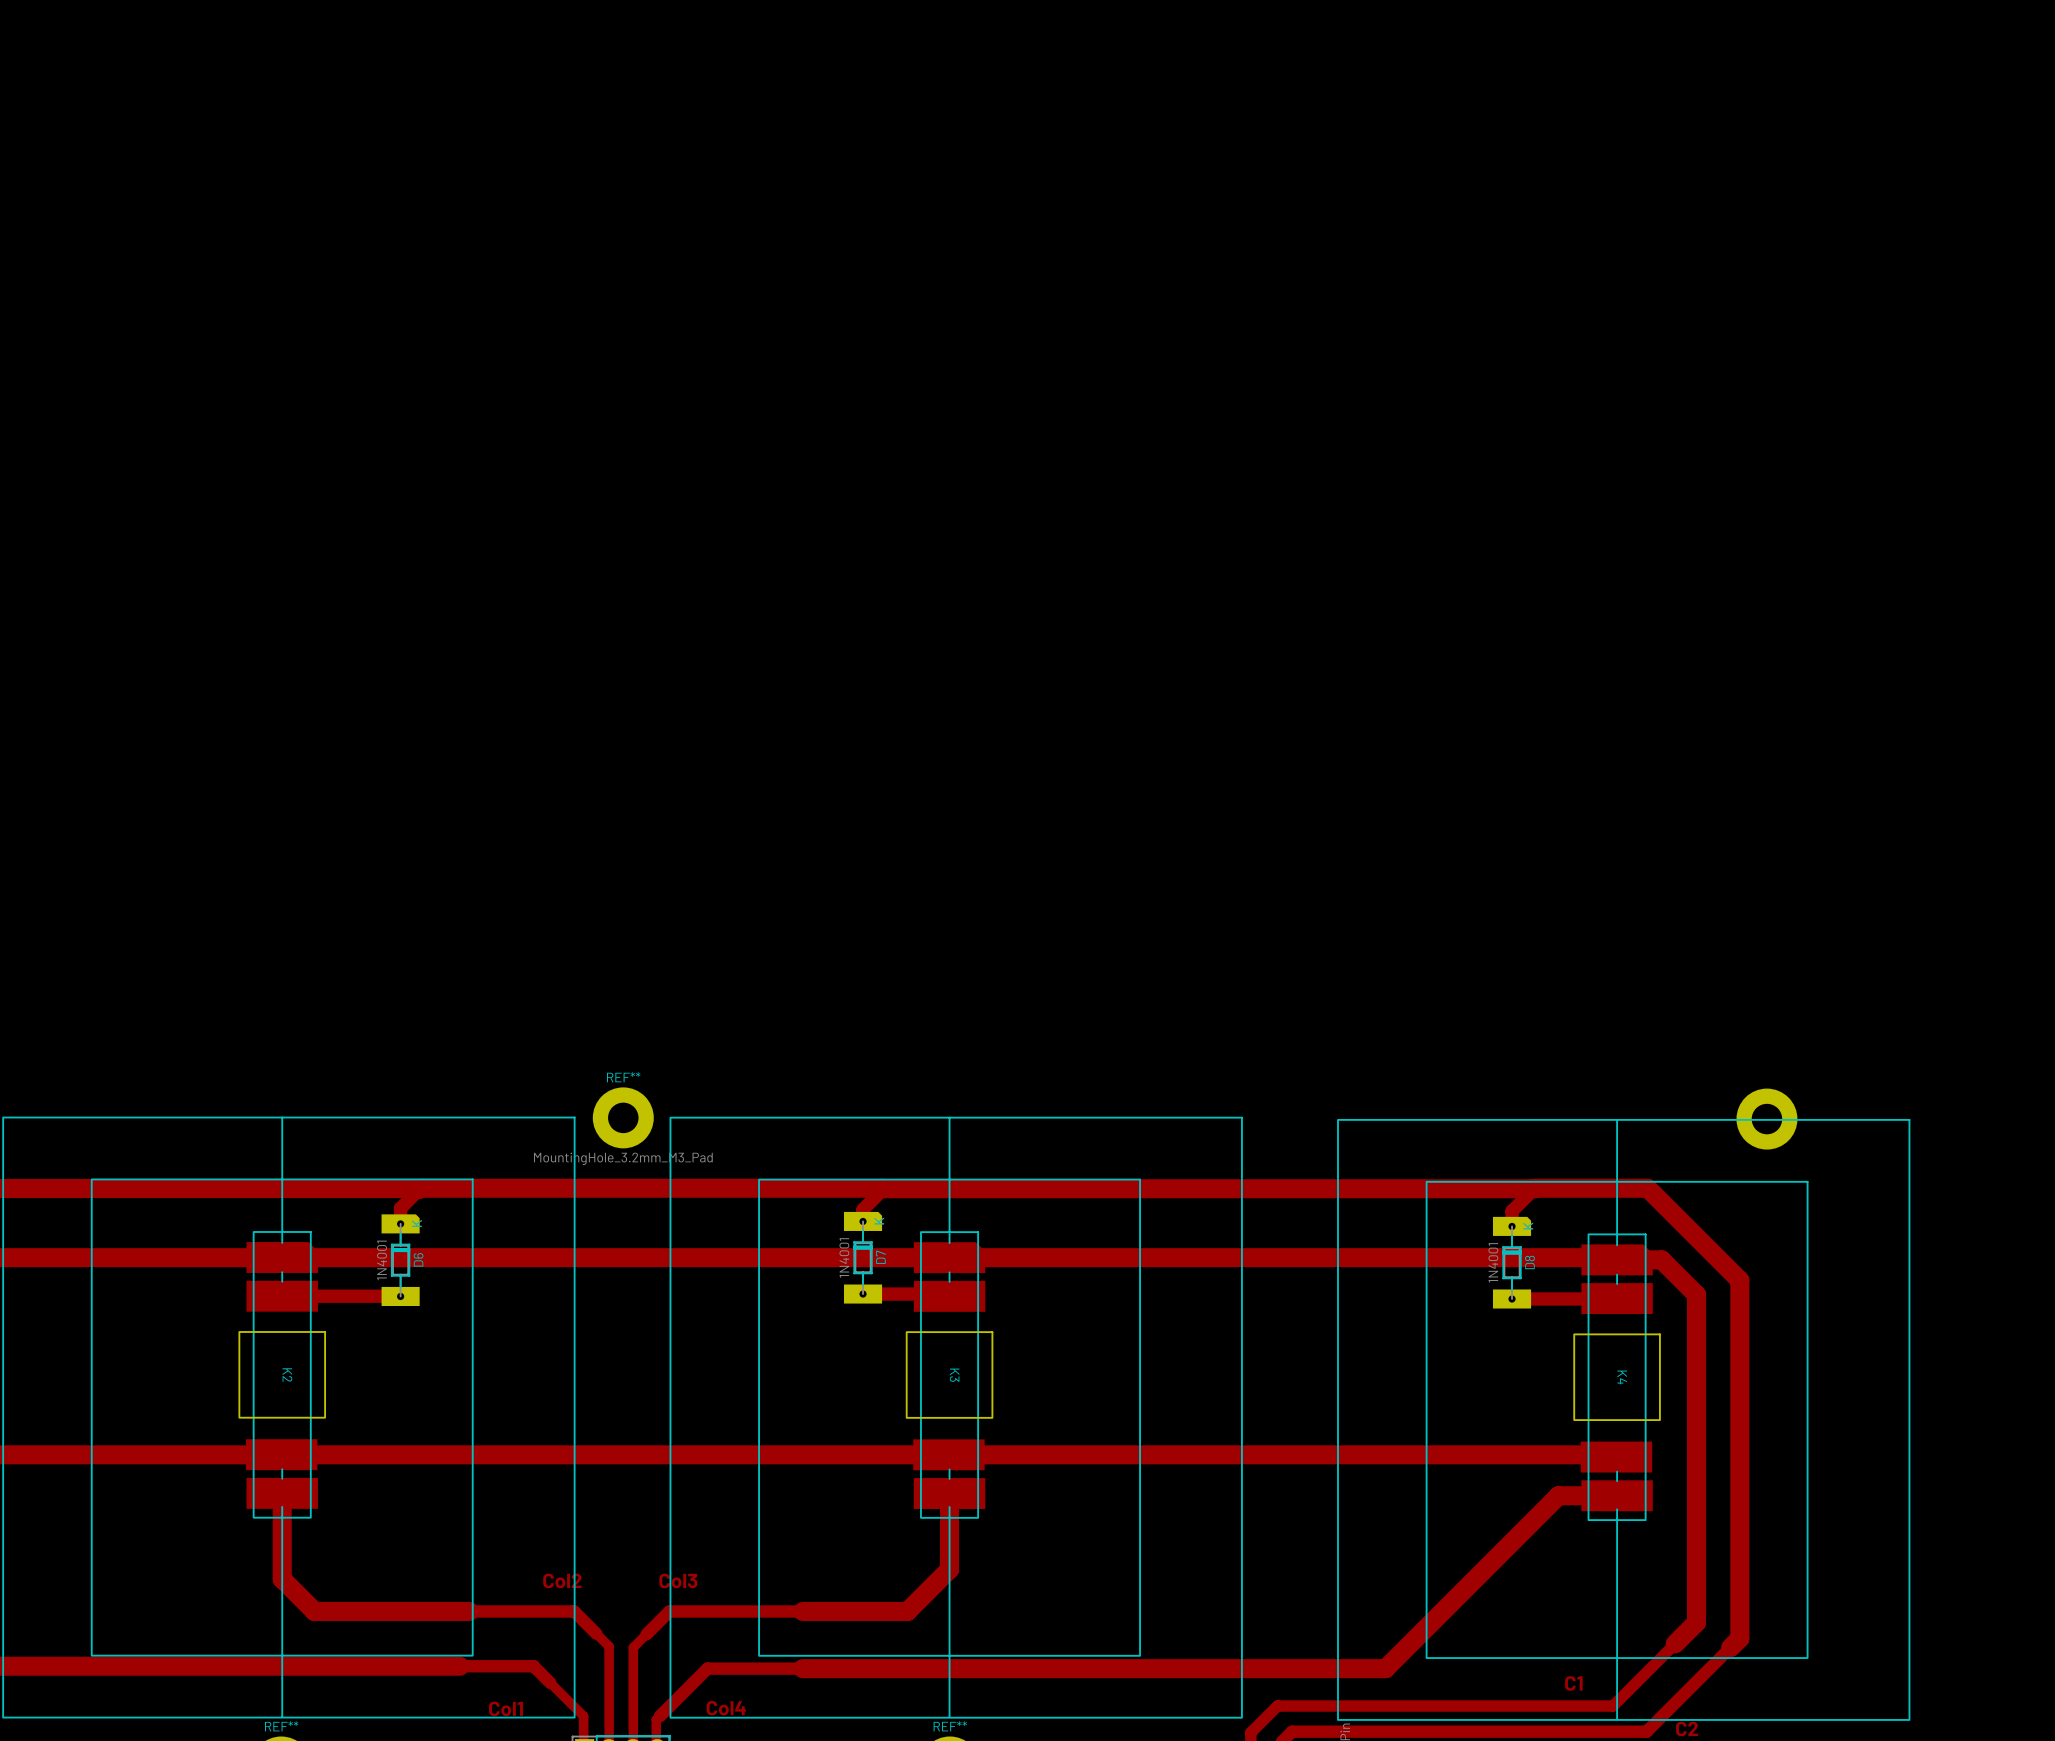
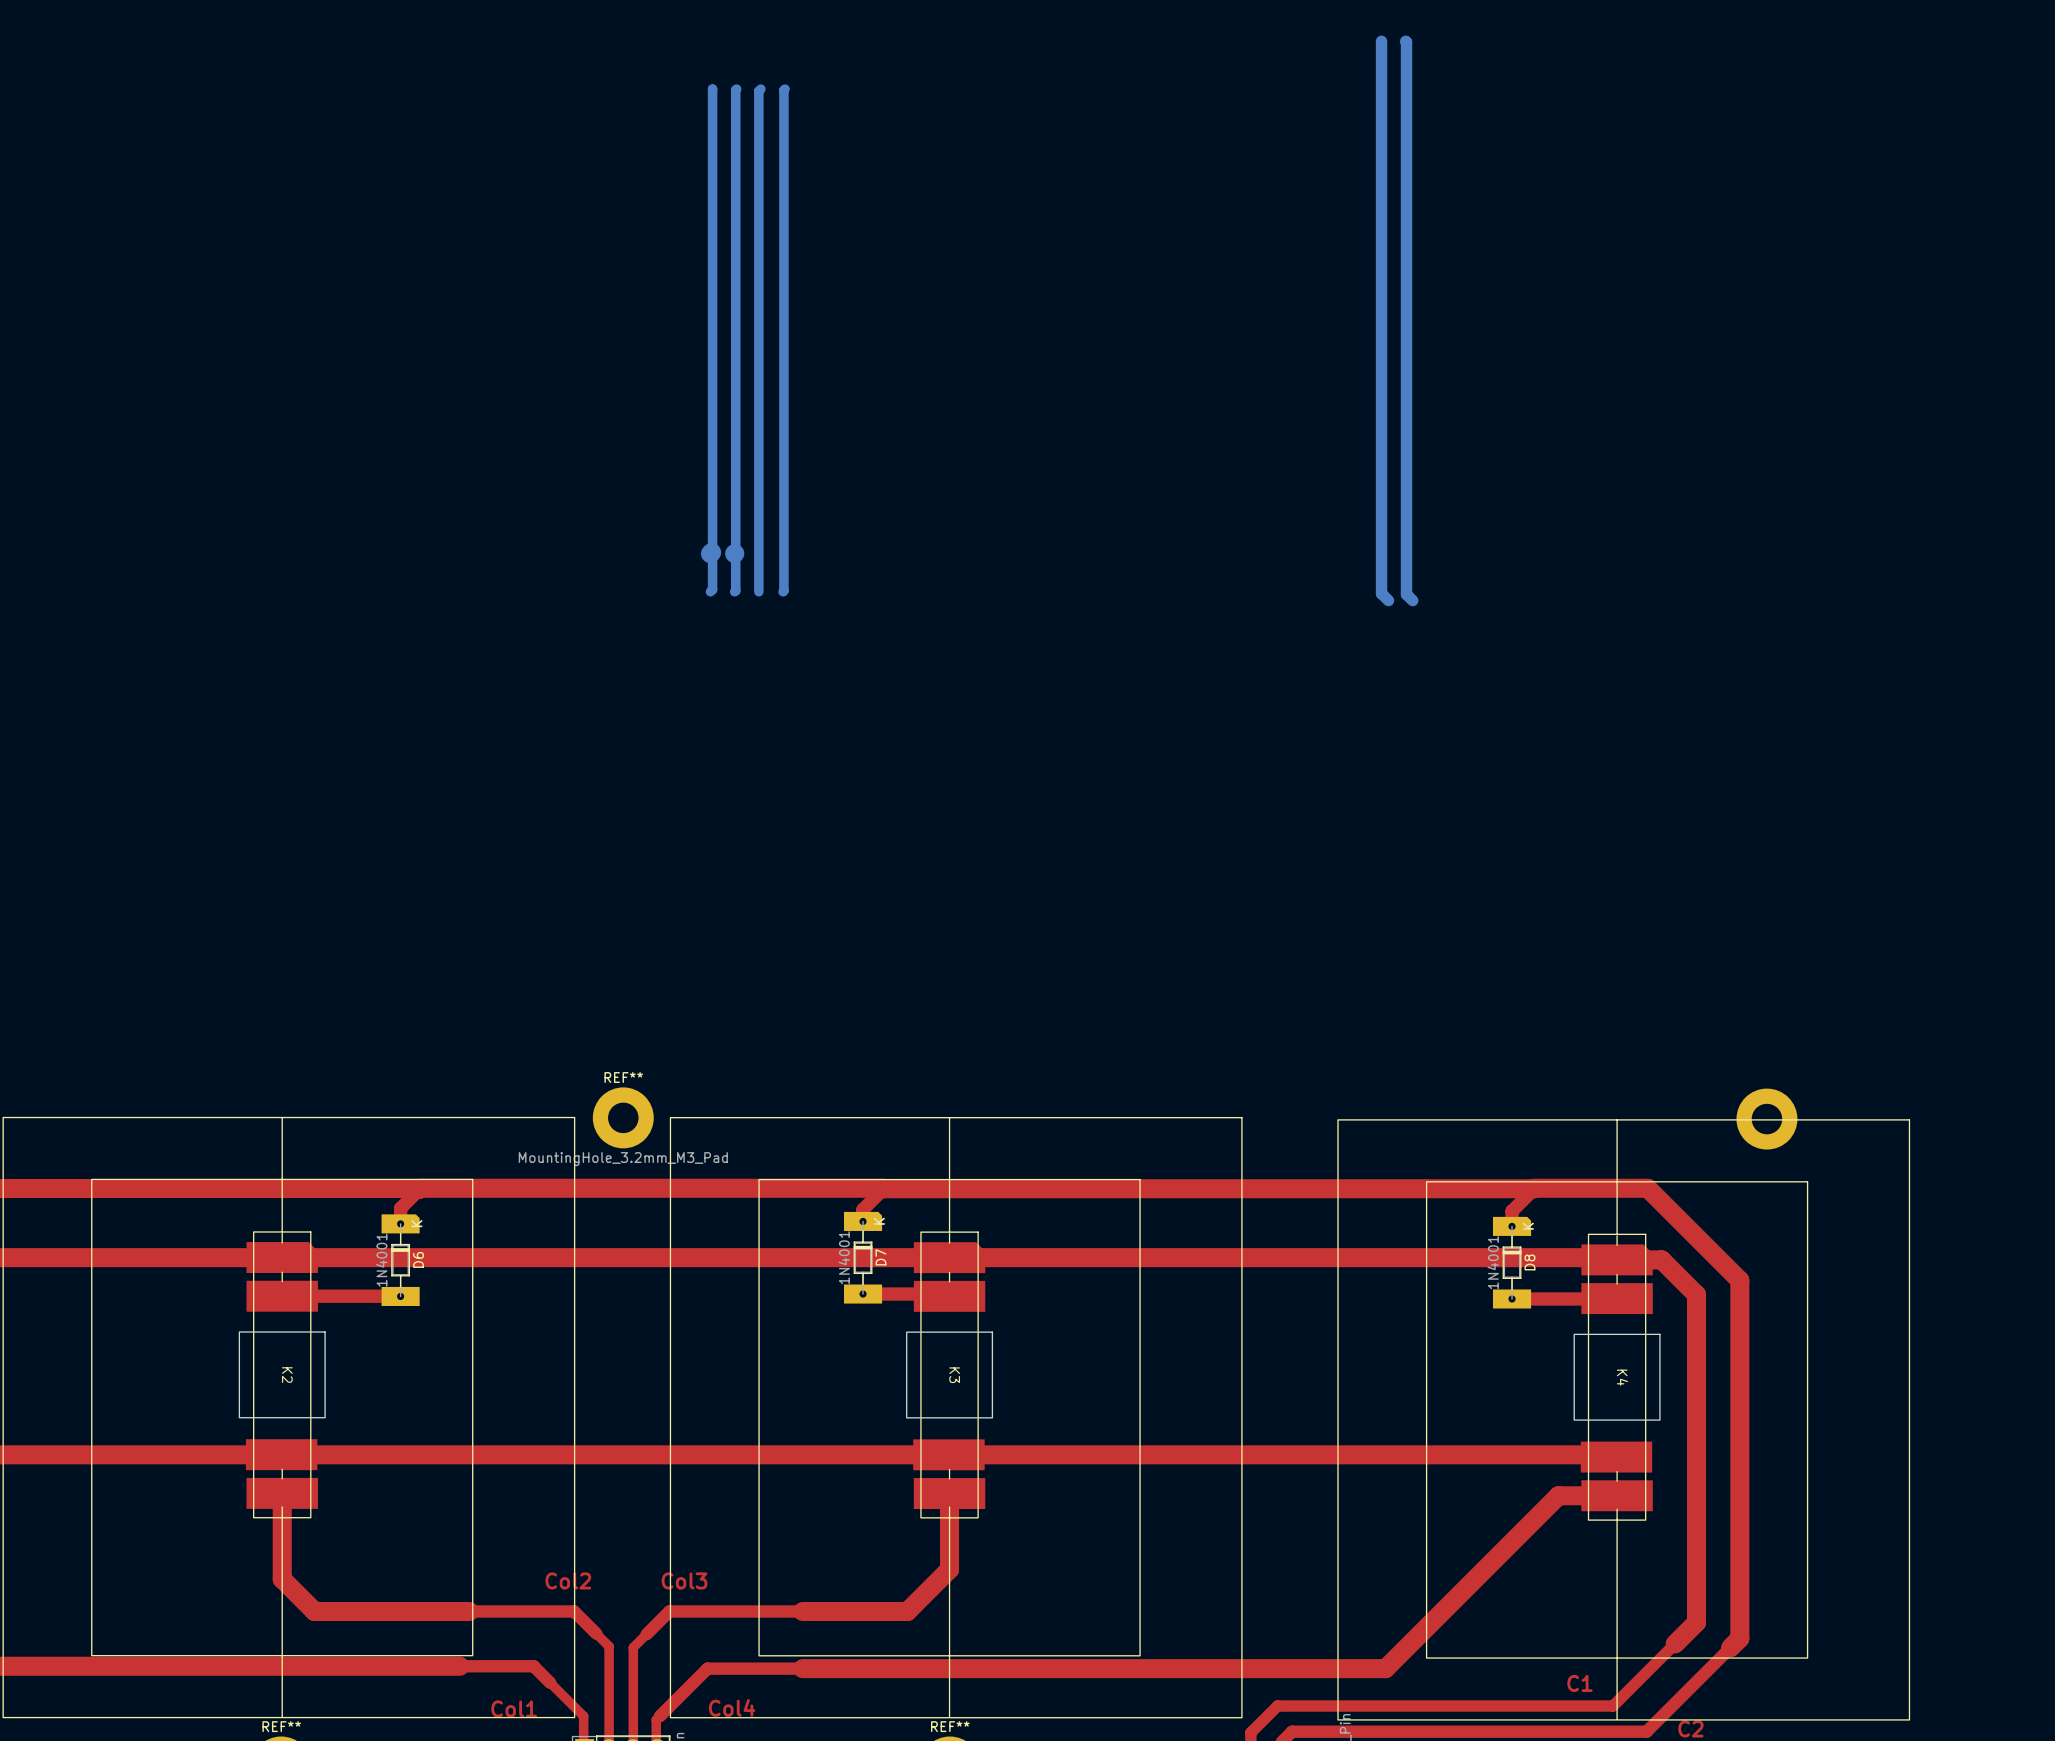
bottom track: none -> (1381, 41) (1381, 593) (1388, 600)
bottom track: none -> (1405, 41) (1406, 594) (1412, 600)
bottom track: none -> (712, 89) (712, 589) (710, 591)
bottom track: none -> (736, 89) (734, 591)
bottom track: none -> (760, 89) (758, 91) (758, 591)
bottom track: none -> (785, 89) (783, 591)
bottom track: none -> (711, 552) (710, 553)
bottom track: none -> (734, 553) (734, 553)

